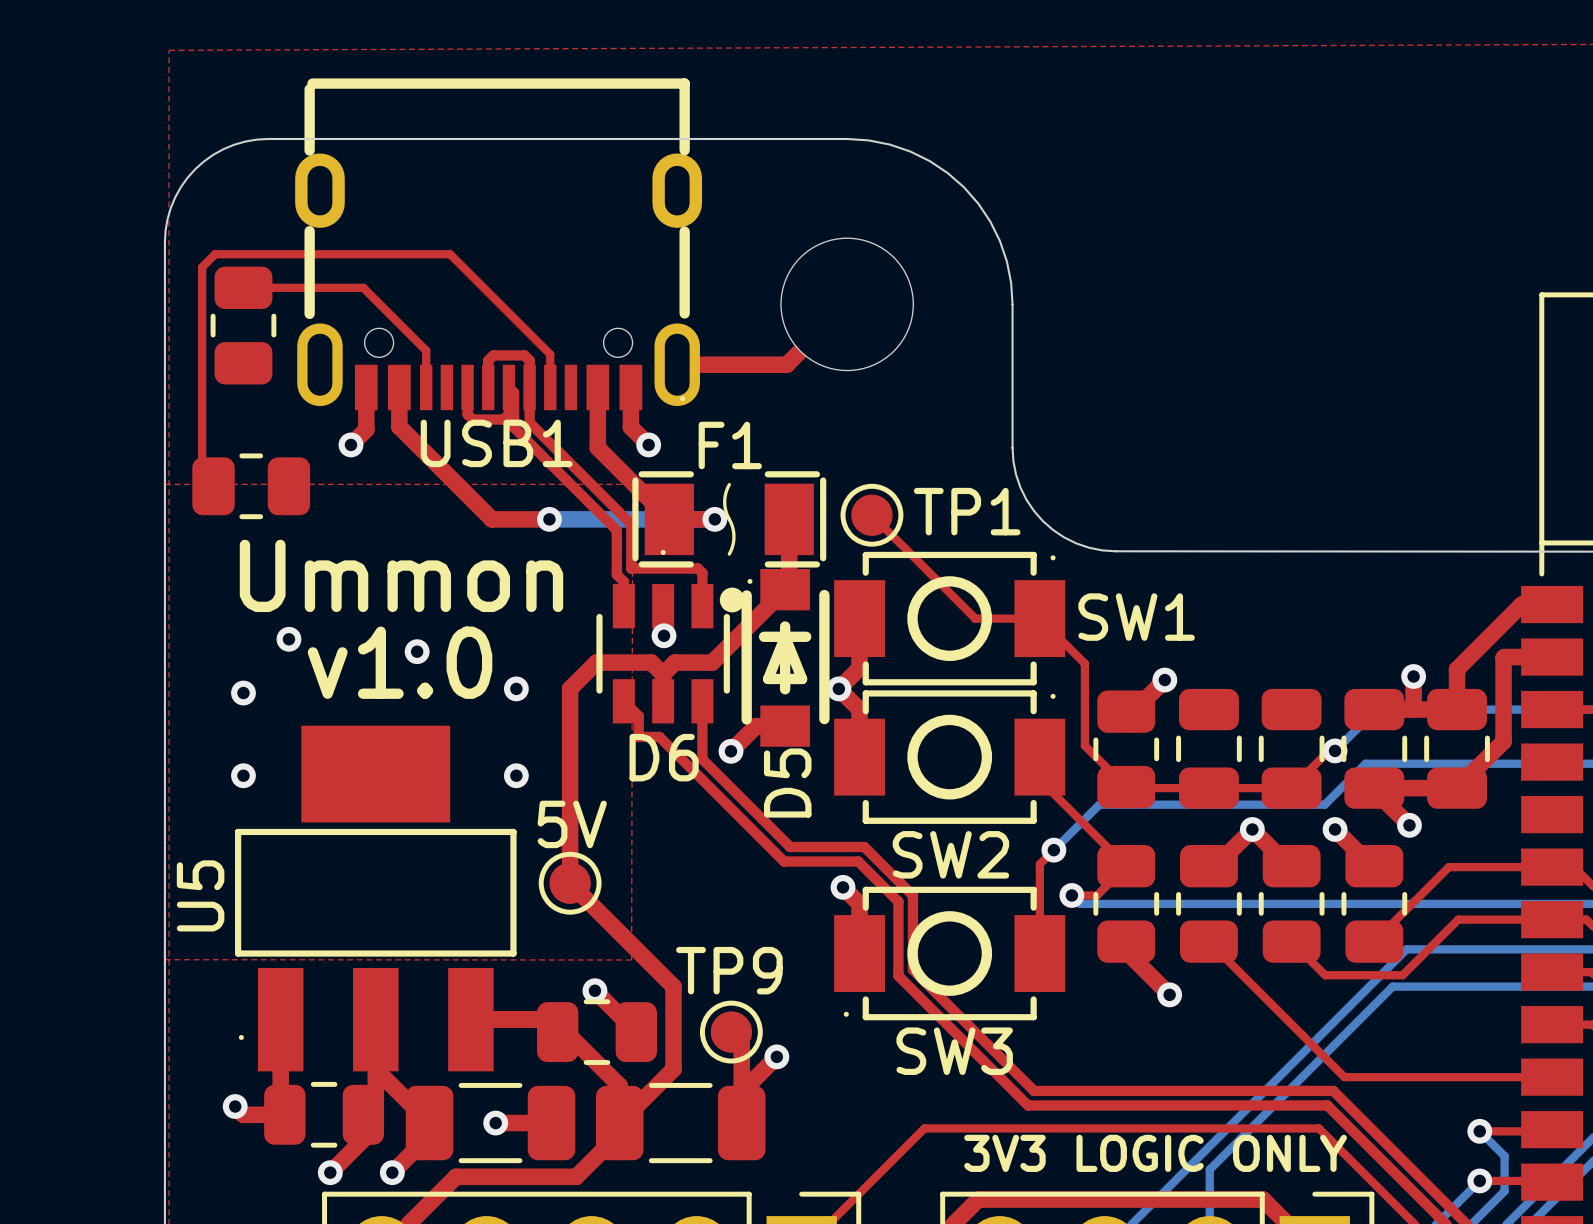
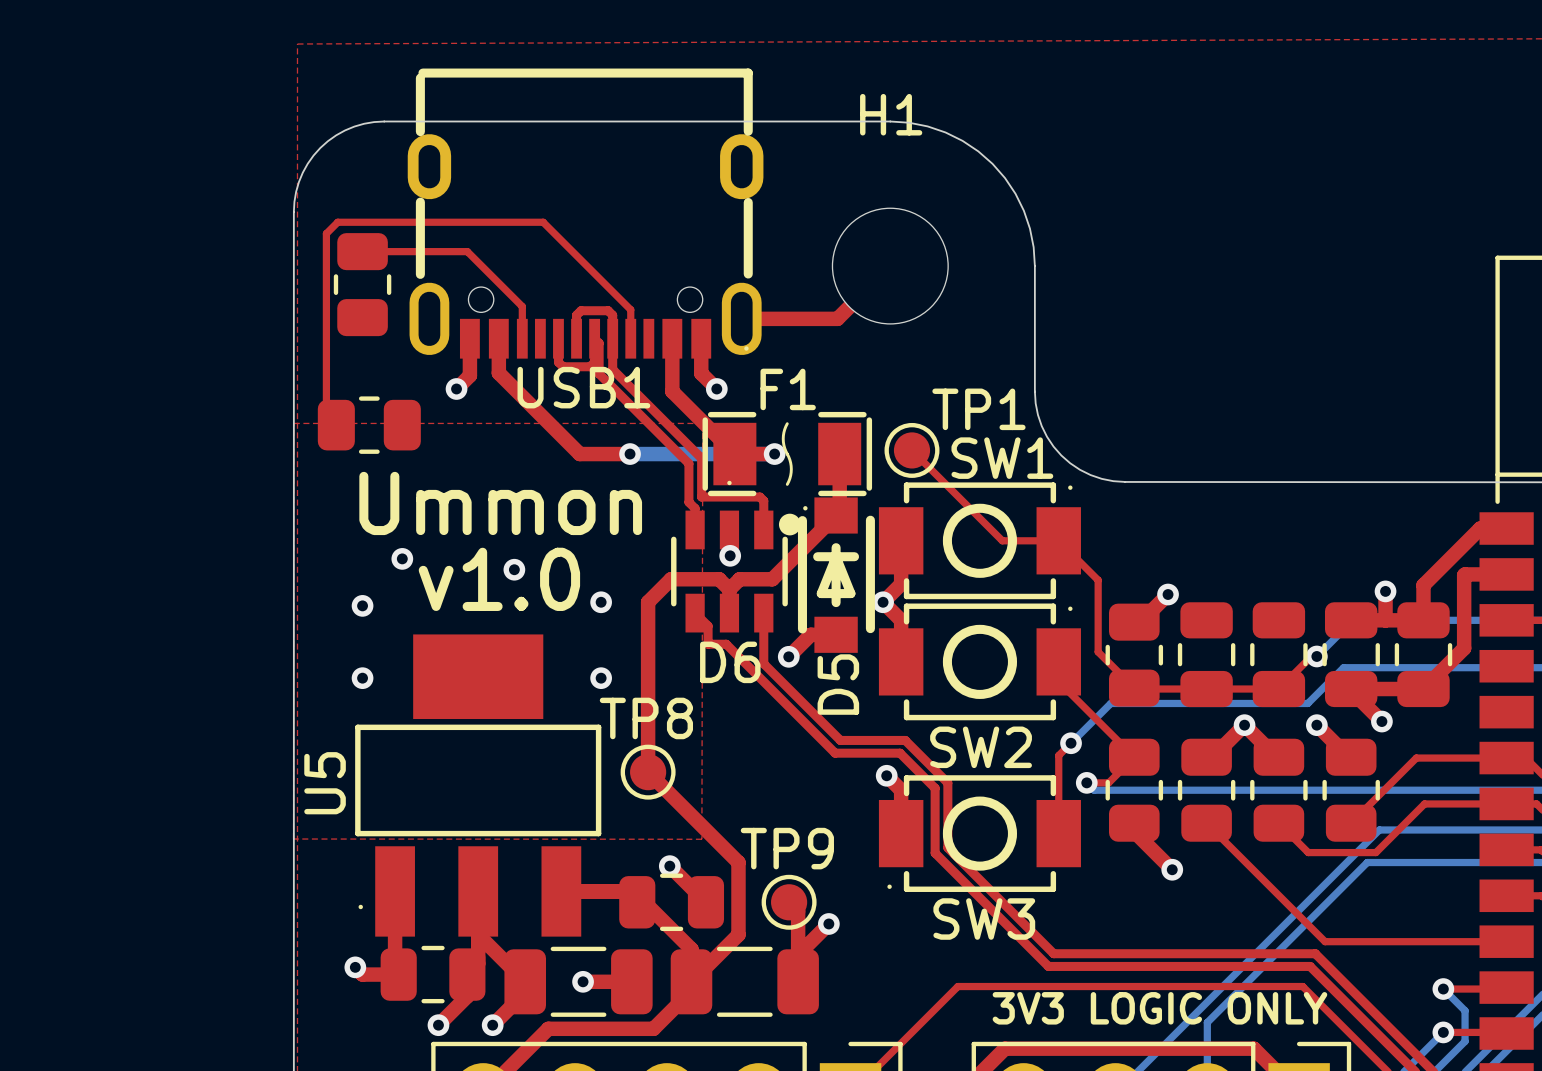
H1 name: none -> H1 (891, 114)
TP1 name position: TP1 (967, 511) -> TP1 (978, 409)
SW1 name position: SW1 (1136, 617) -> SW1 (1002, 458)
TP8 name: none -> TP8 (646, 718)
TP8 value: 5V (572, 824) -> none

